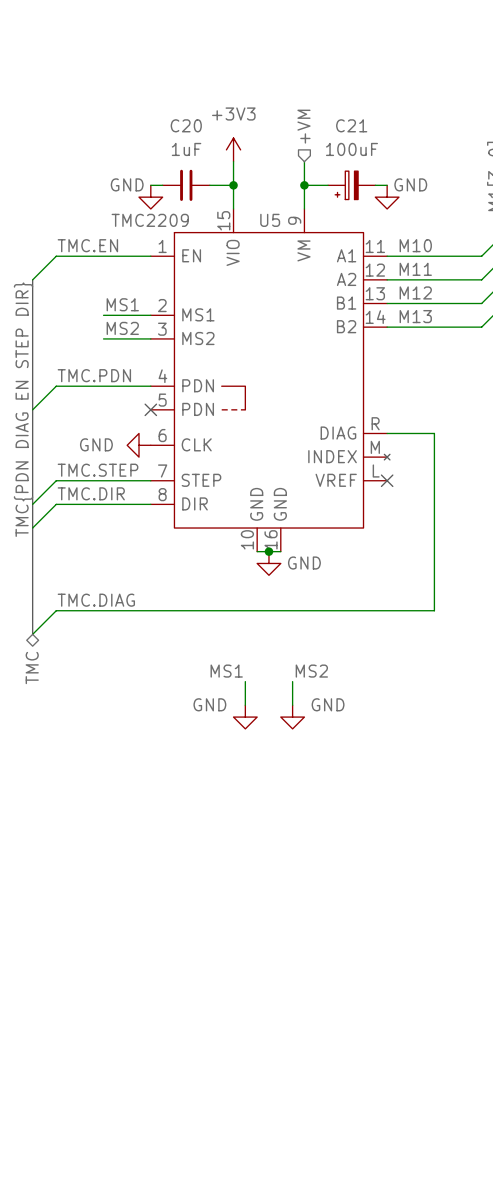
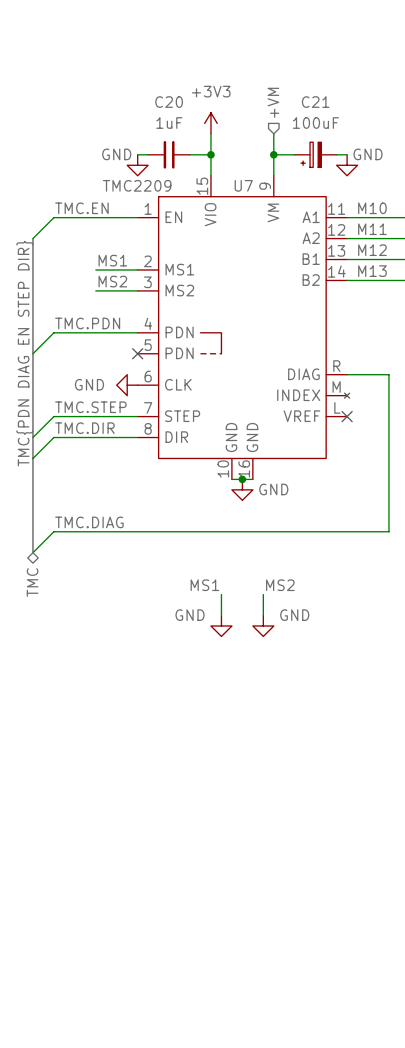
U5 name: U5 (270, 220) -> U7 (243, 185)

